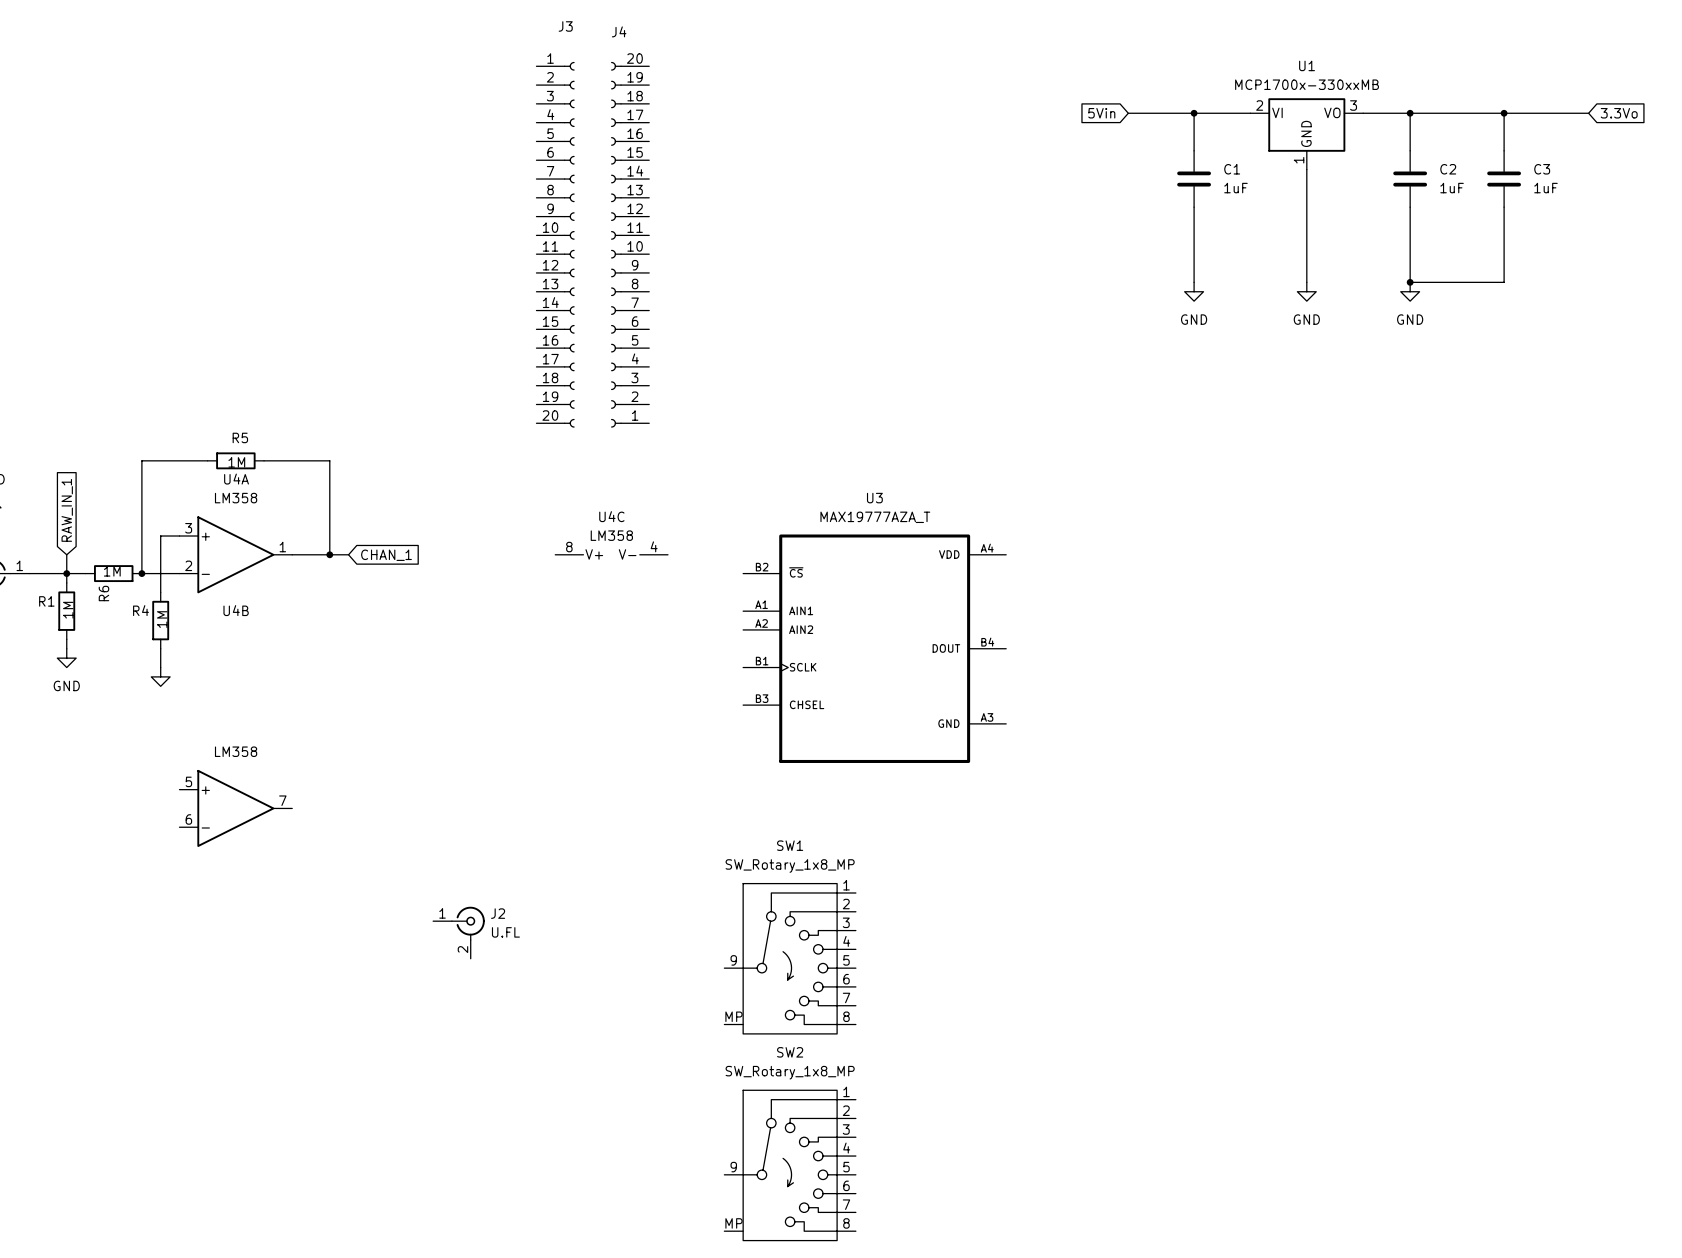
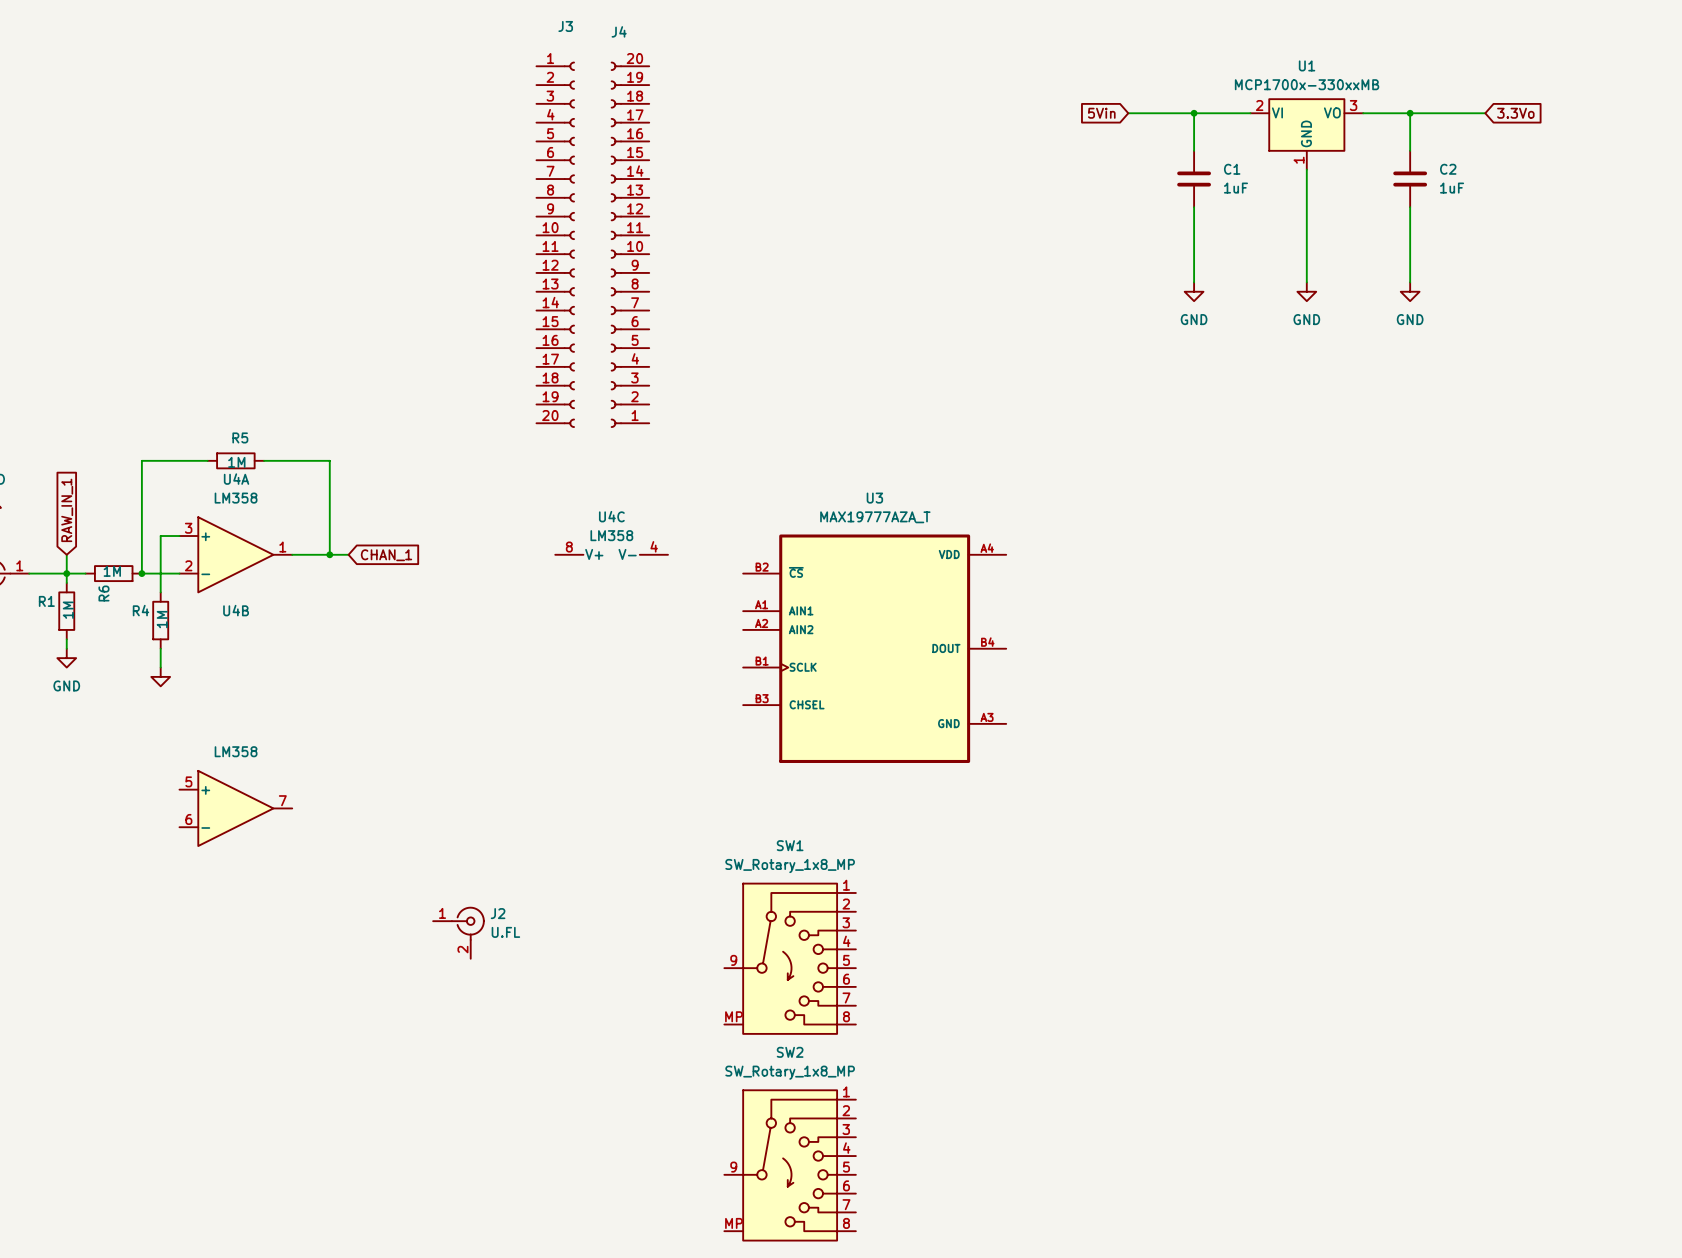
wire: (1485, 113) (1588, 113) -> none
wire: (1504, 113) (1504, 150) -> none
junction: (1504, 113) -> none
global label position: 3.3Vo (1619, 113) -> 3.3Vo (1515, 113)
C3: 1uF (1504, 179) -> none
wire: (1504, 207) (1504, 282) (1410, 282) -> none
junction: (1410, 282) -> none

